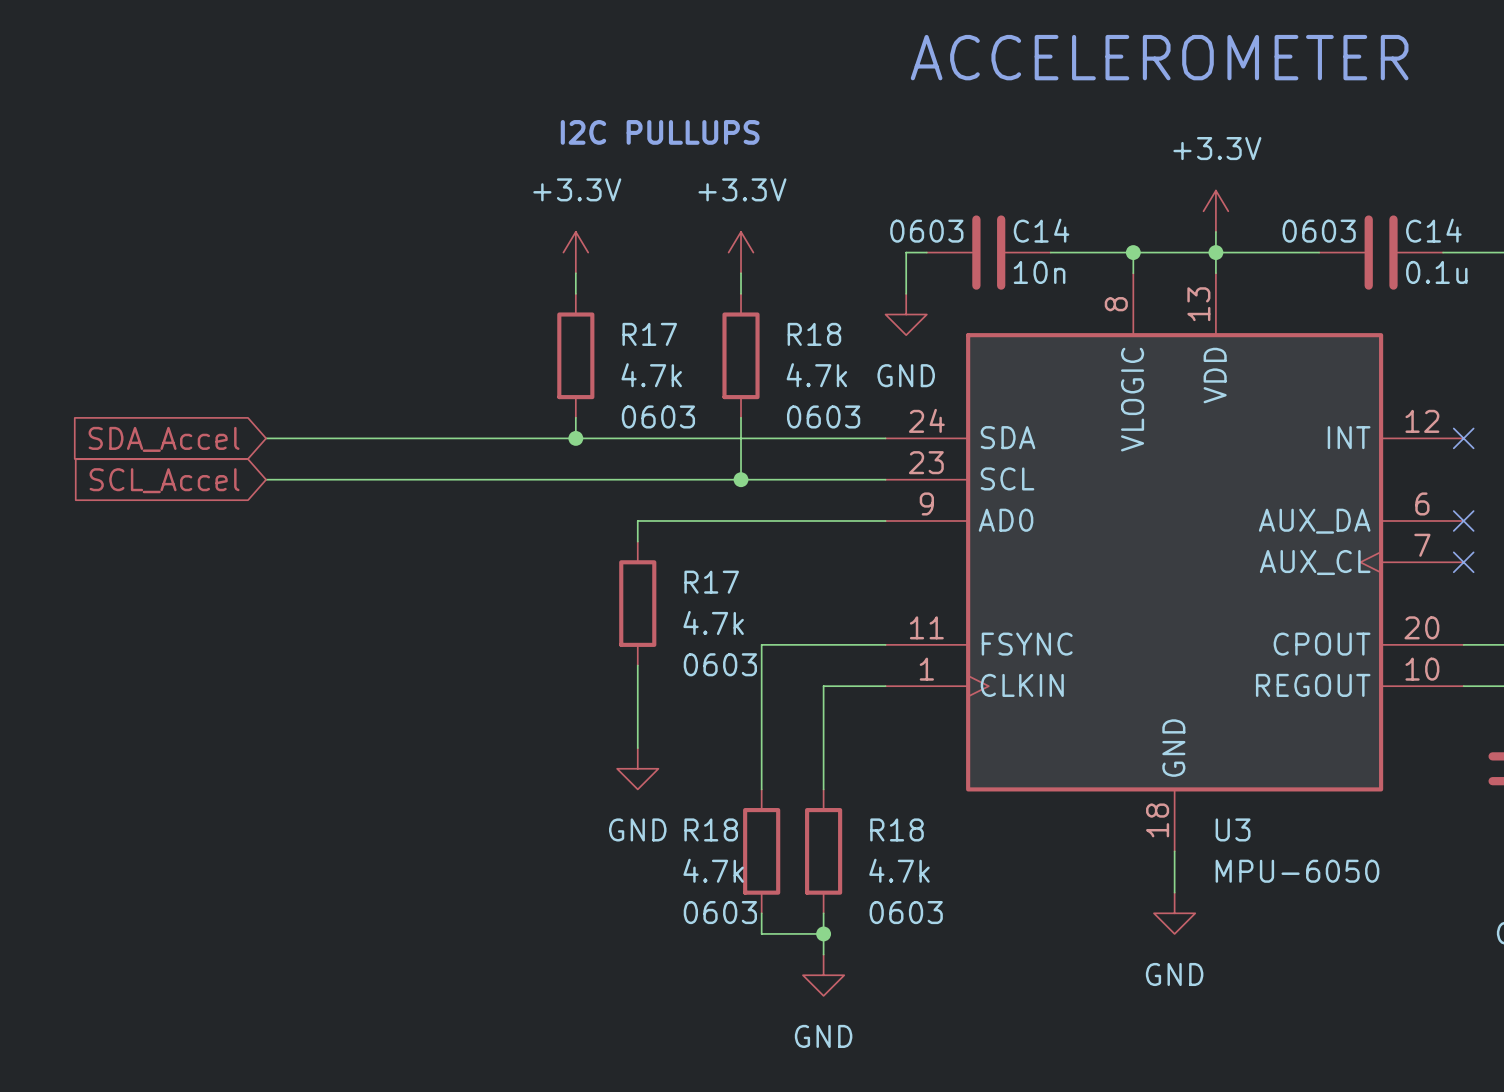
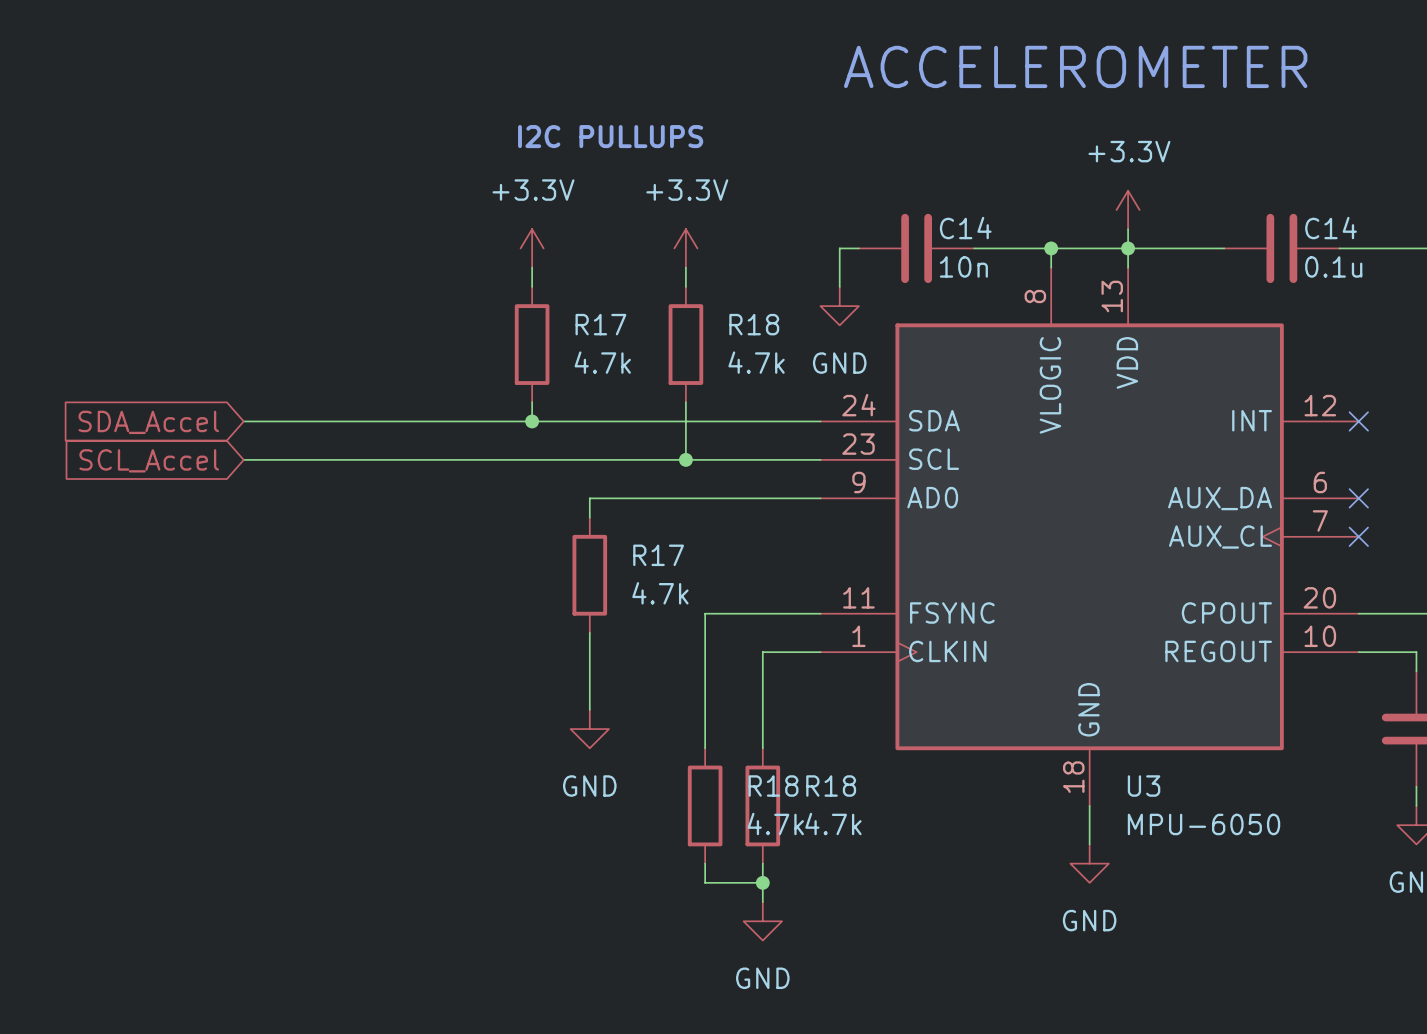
C14 text: 0603 (926, 231) -> none
C14 text: 0603 (1319, 231) -> none
R17 text: 0603 (658, 416) -> none
R18 text: 0603 (823, 416) -> none
R17 text: 0603 (720, 664) -> none
R18 name position: R18 (711, 829) -> R18 (773, 786)
R18 value position: 4.7k (713, 870) -> 4.7k (775, 824)
R18 text: 0603 (720, 912) -> none
R18 text: 0603 (906, 912) -> none

